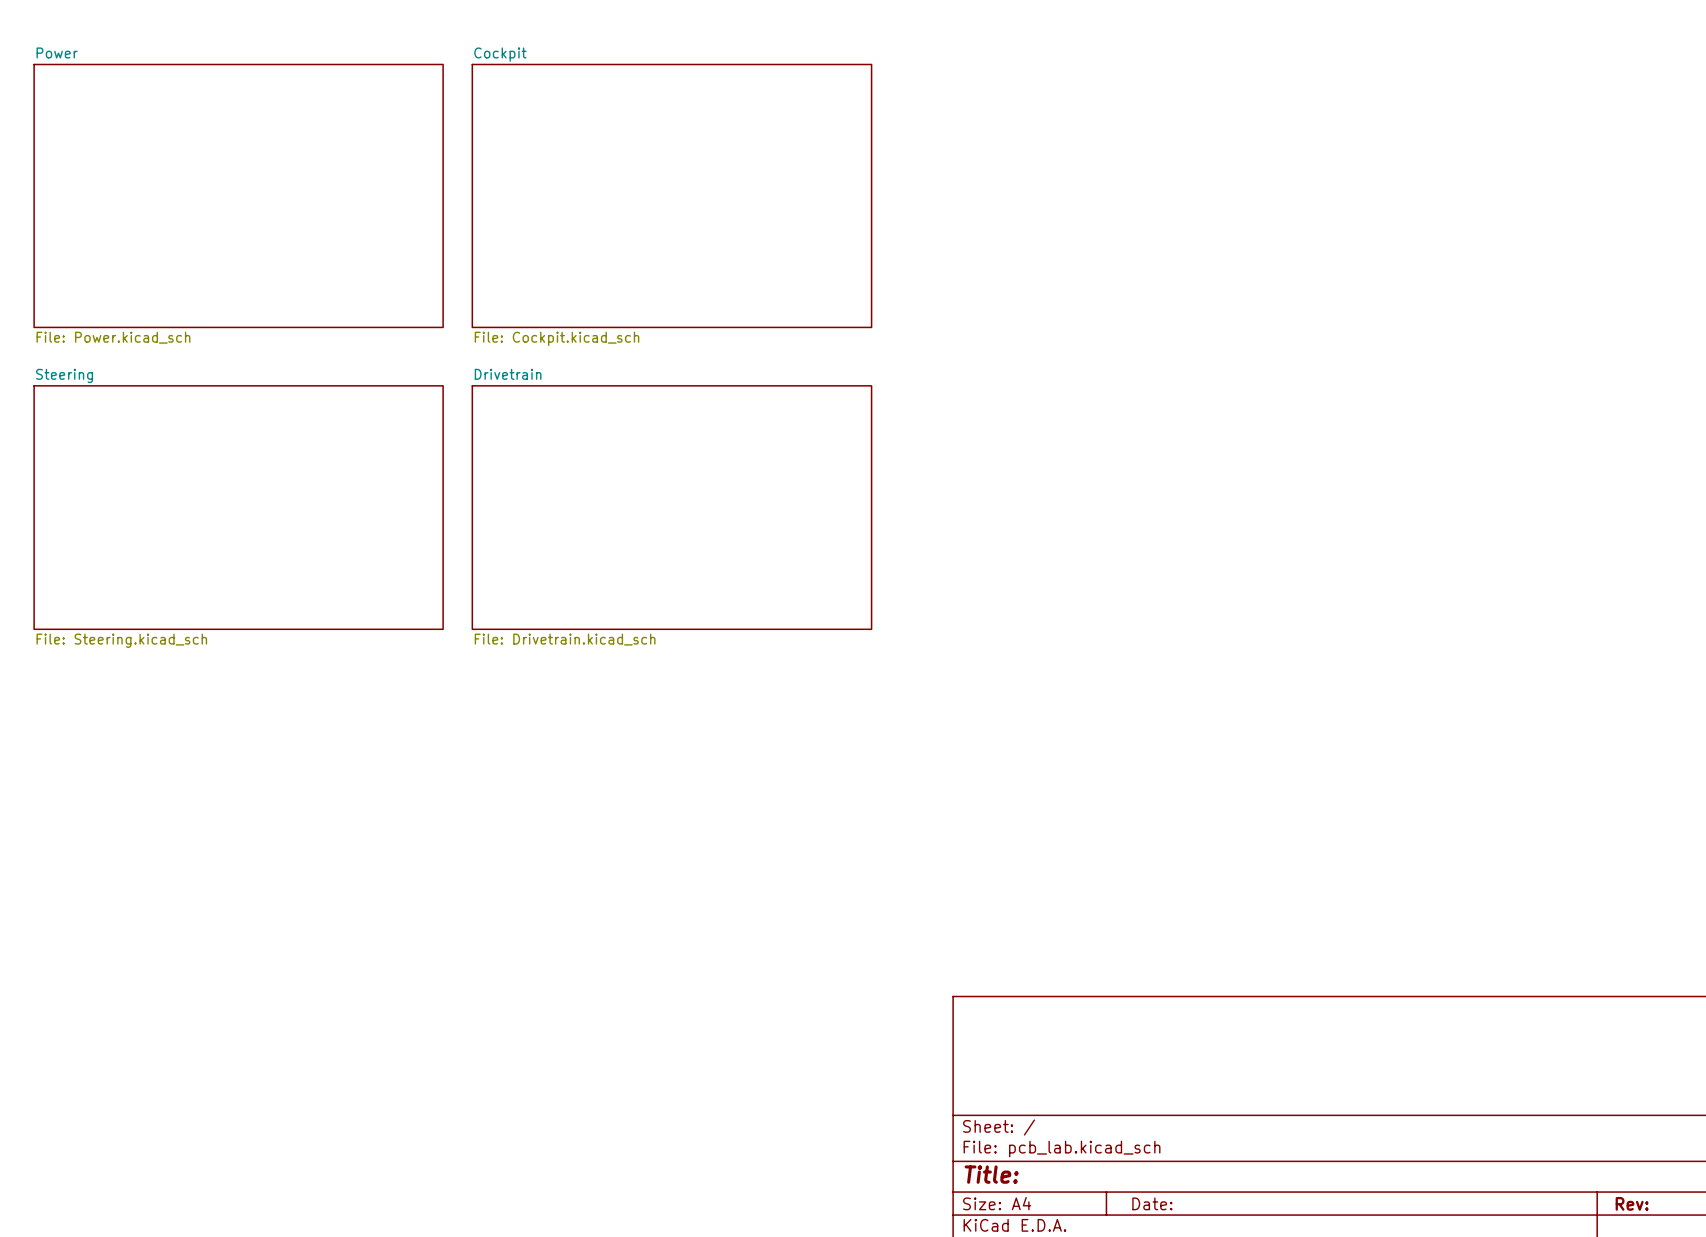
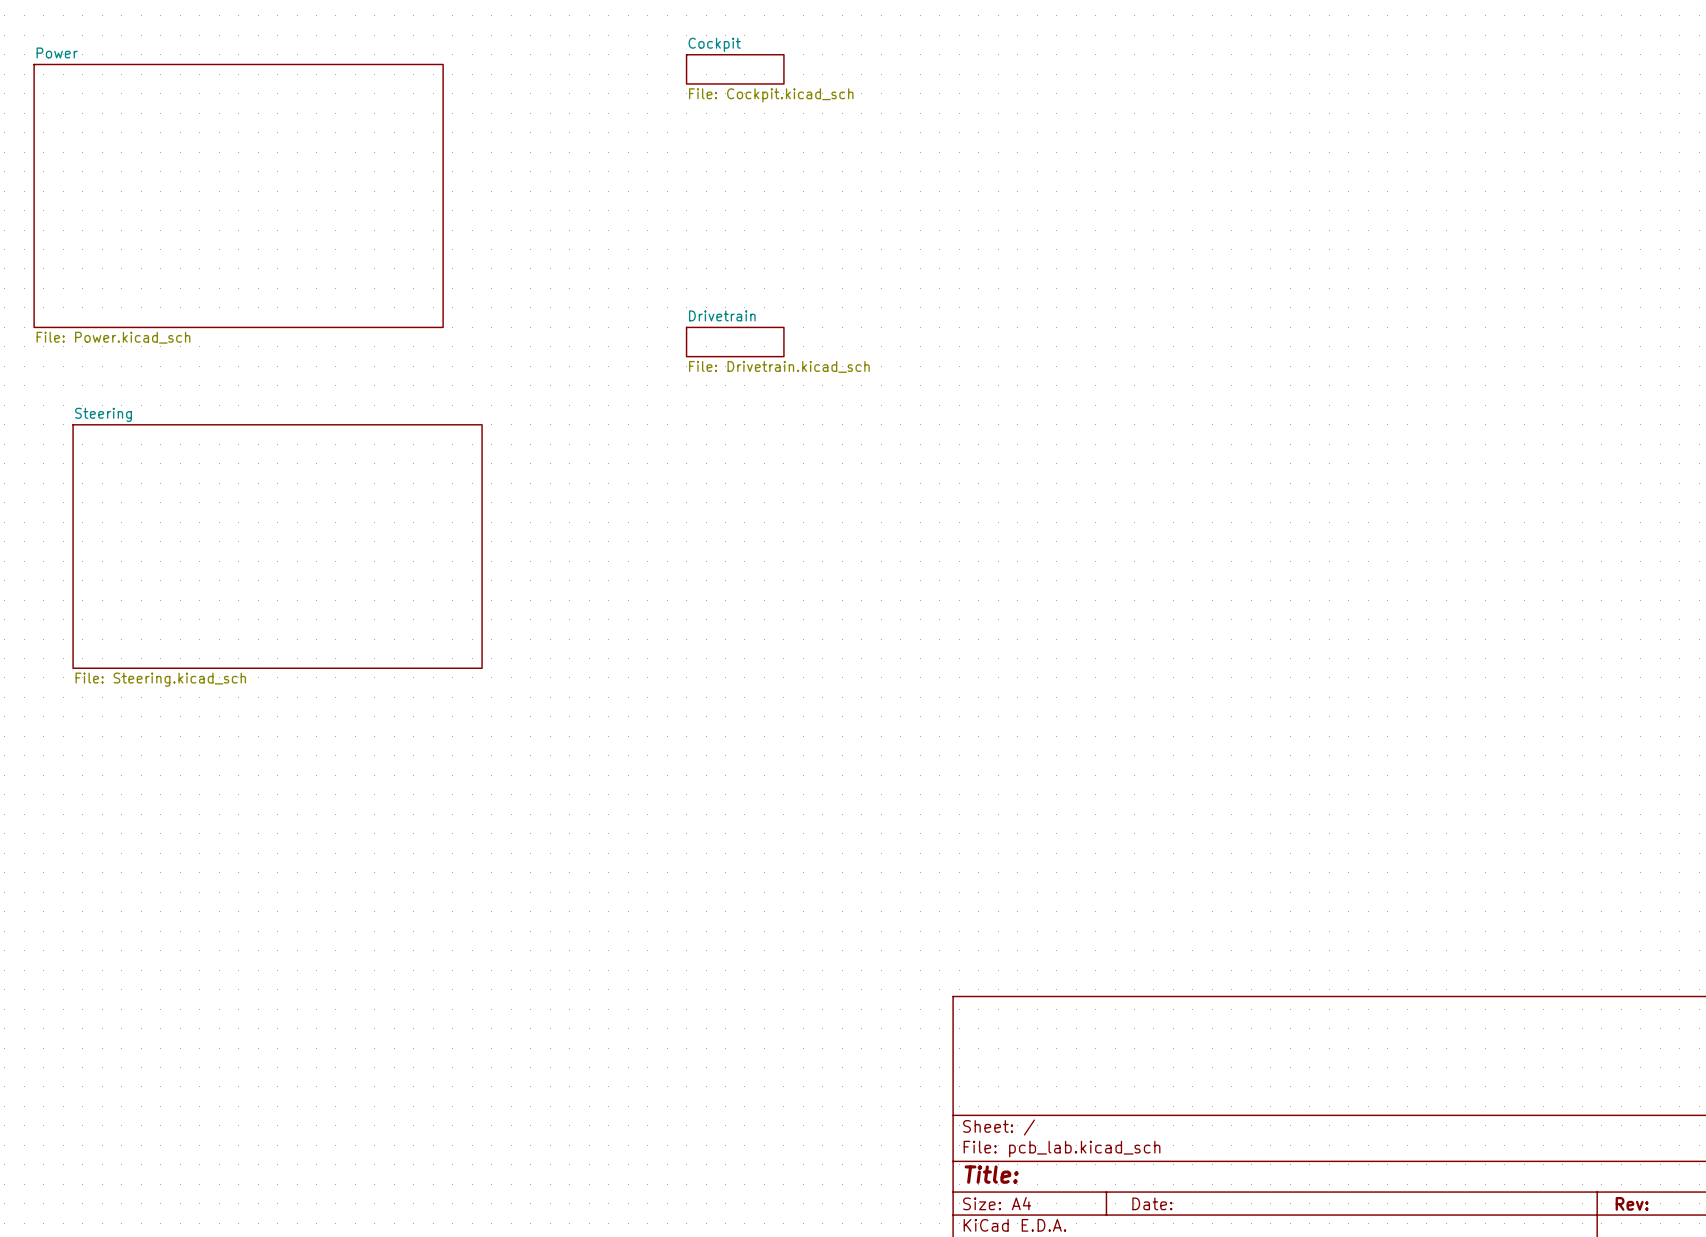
sheet Cockpit: none -> File: Cockpit.kicad_sch (735, 69)
sheet Cockpit: File: Cockpit.kicad_sch (671, 195) -> none
sheet Drivetrain: none -> File: Drivetrain.kicad_sch (735, 342)
sheet Steering position: (238, 507) -> (277, 546)
sheet Drivetrain: File: Drivetrain.kicad_sch (671, 507) -> none

